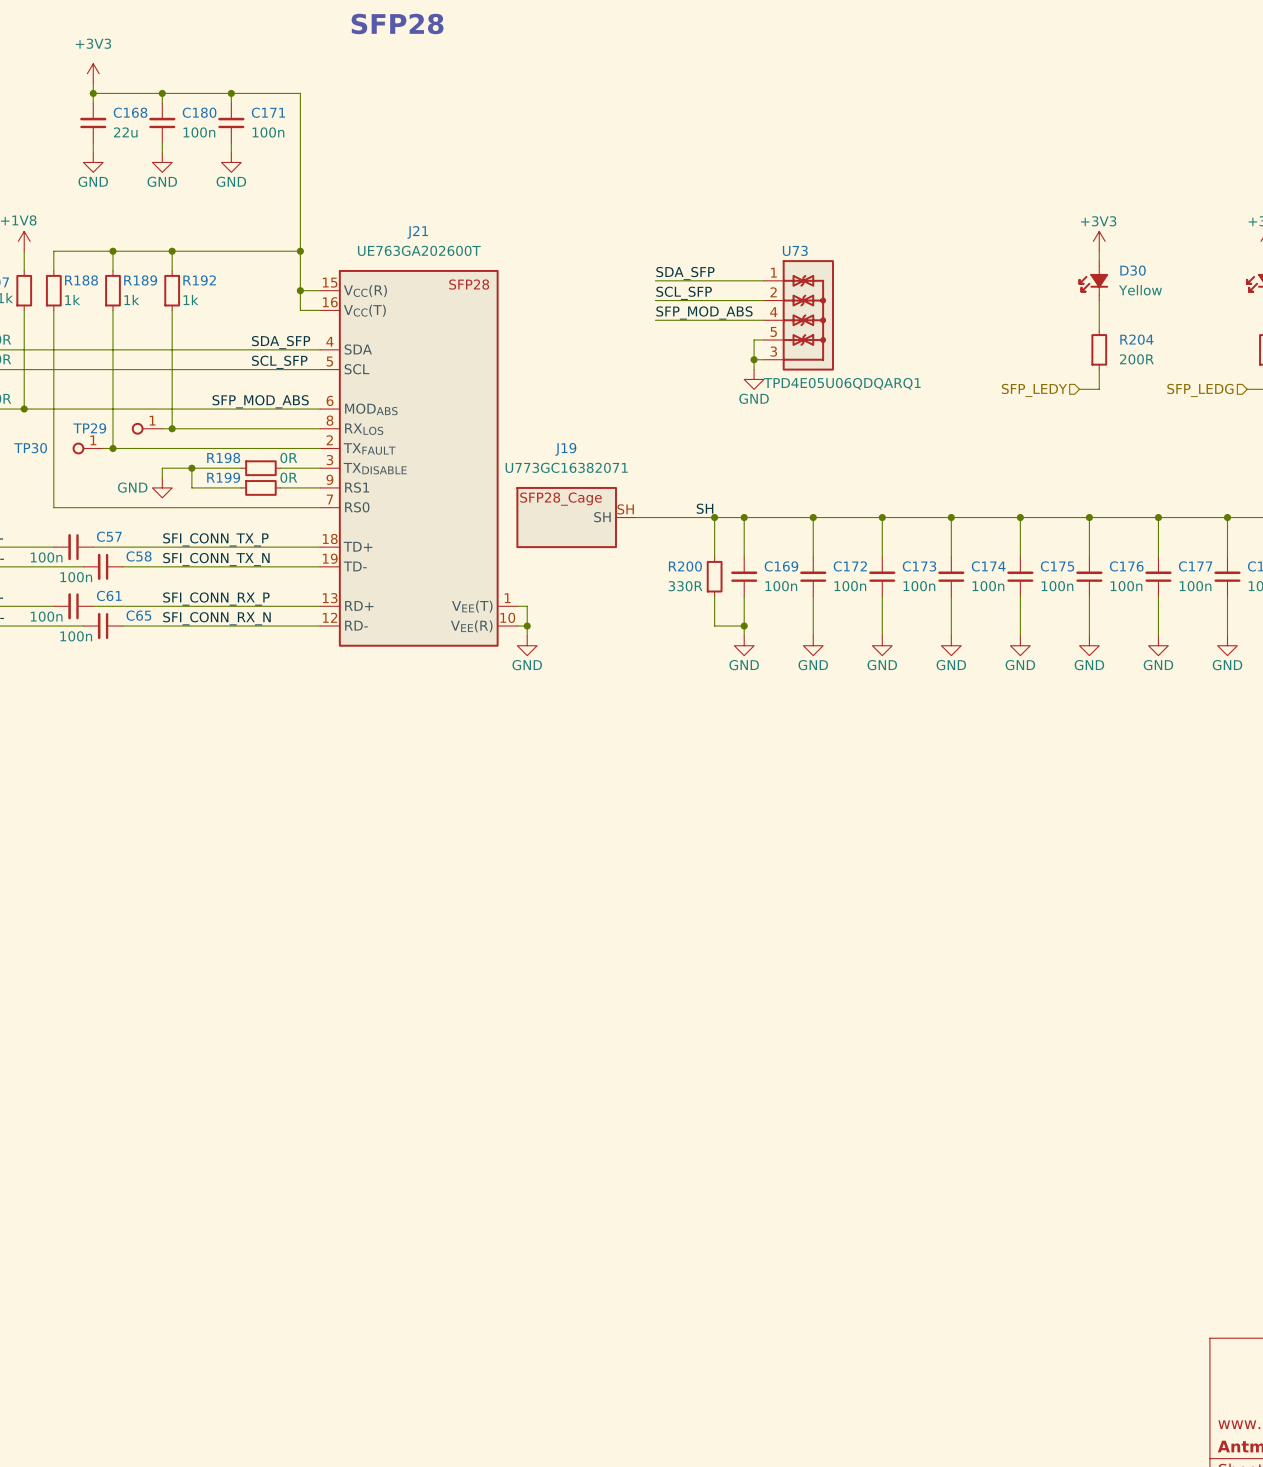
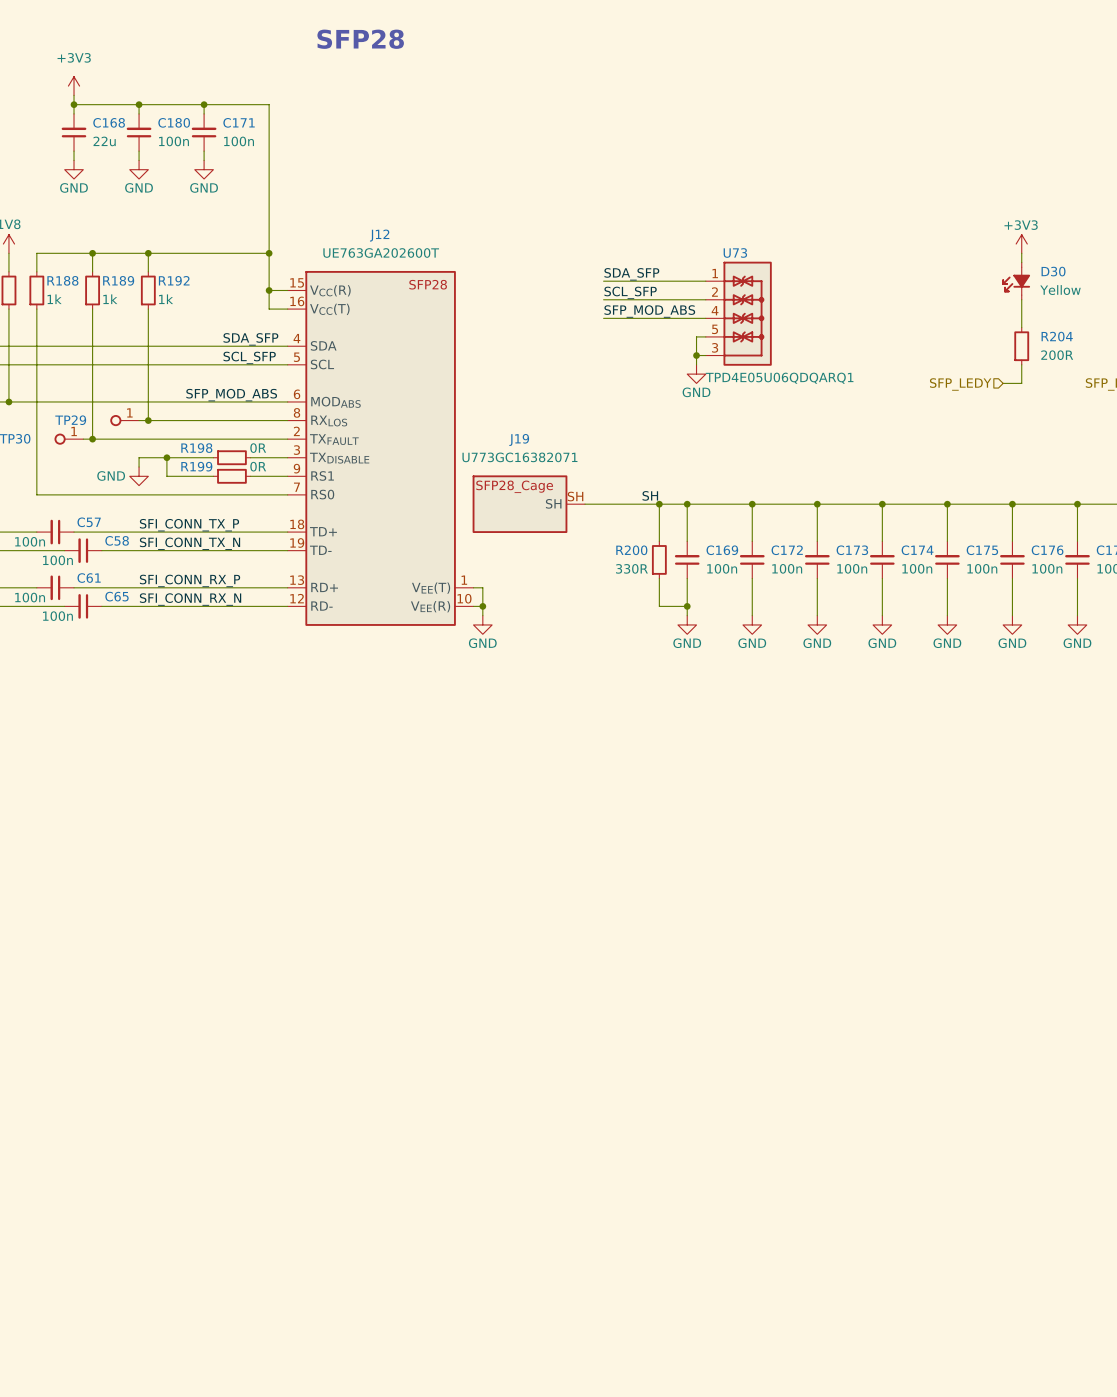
J21 name: J21 (417, 232) -> J12 (379, 235)

